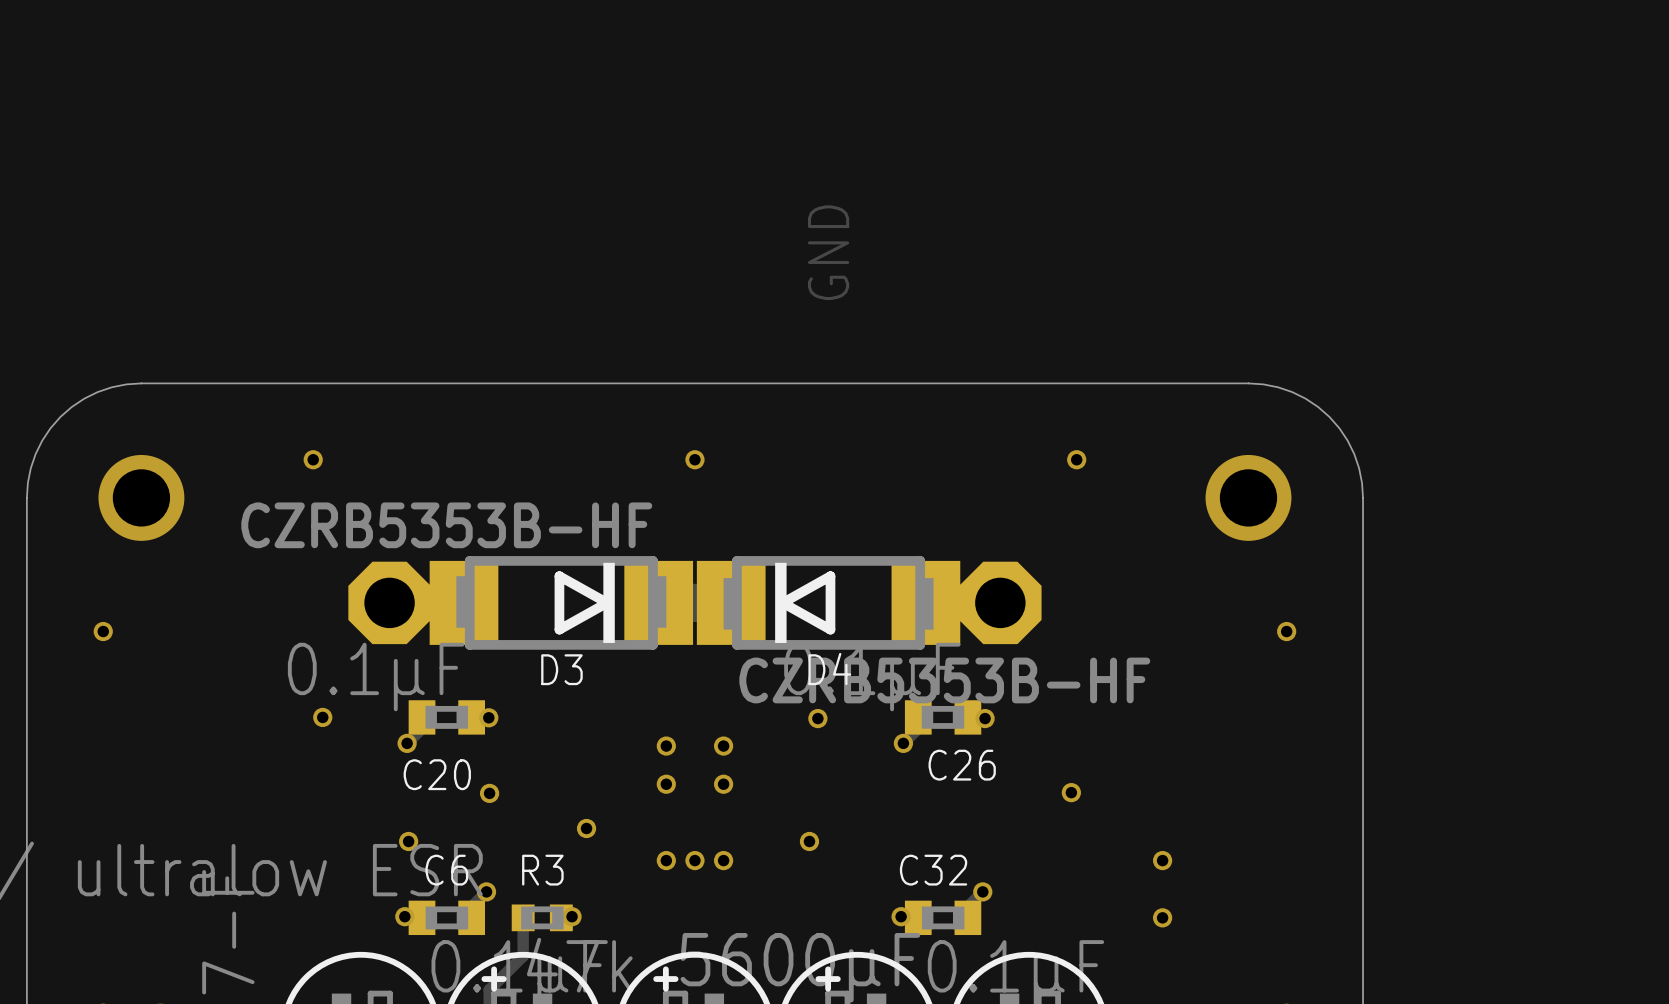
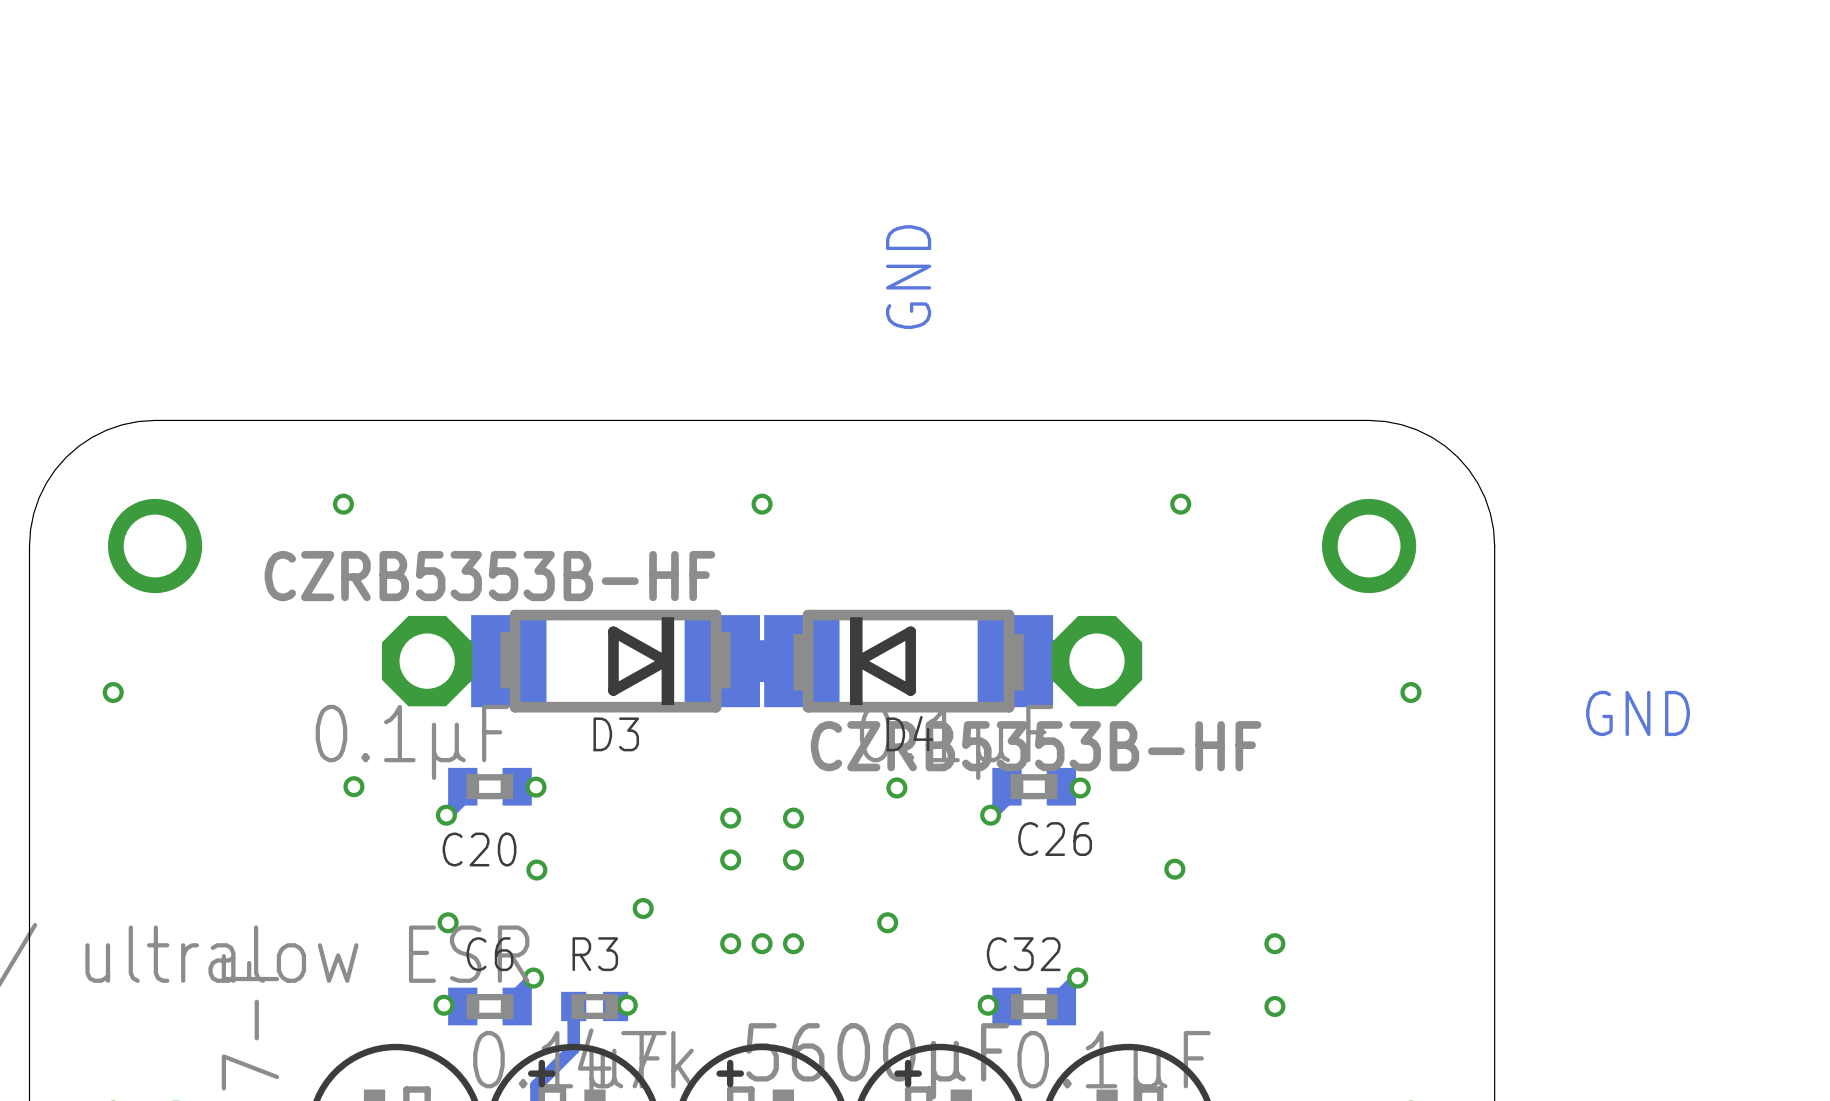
text: none -> GND (1638, 713)

